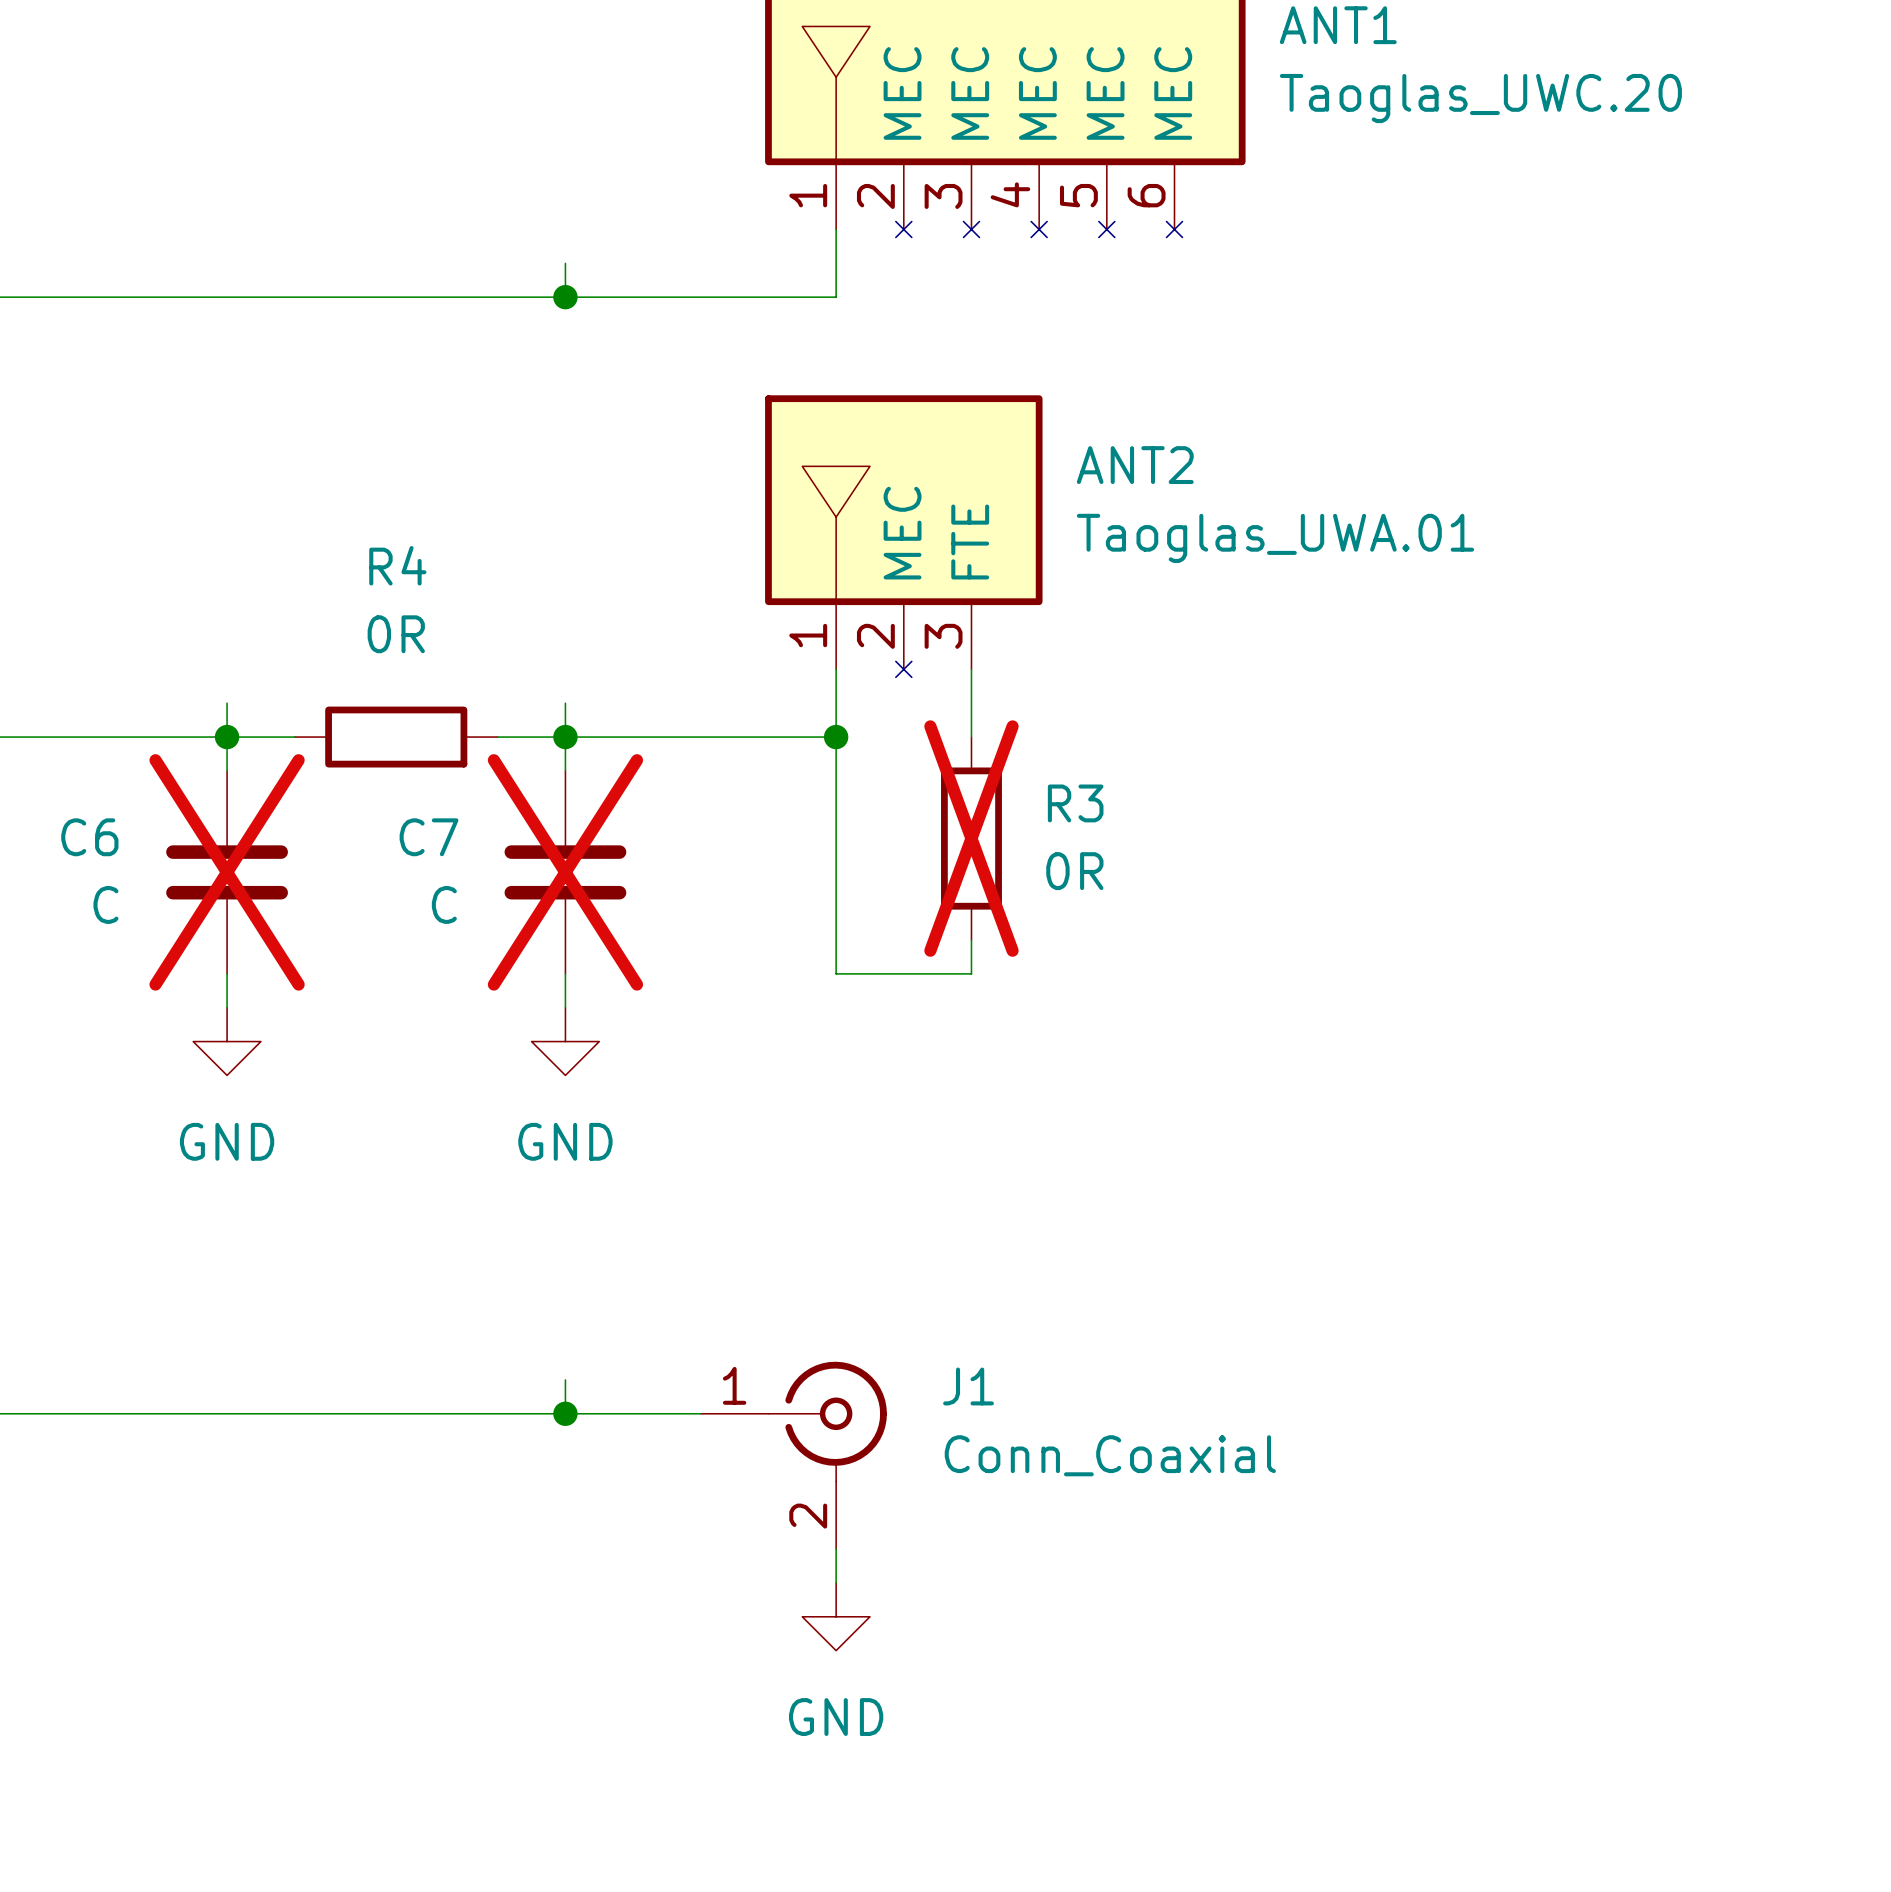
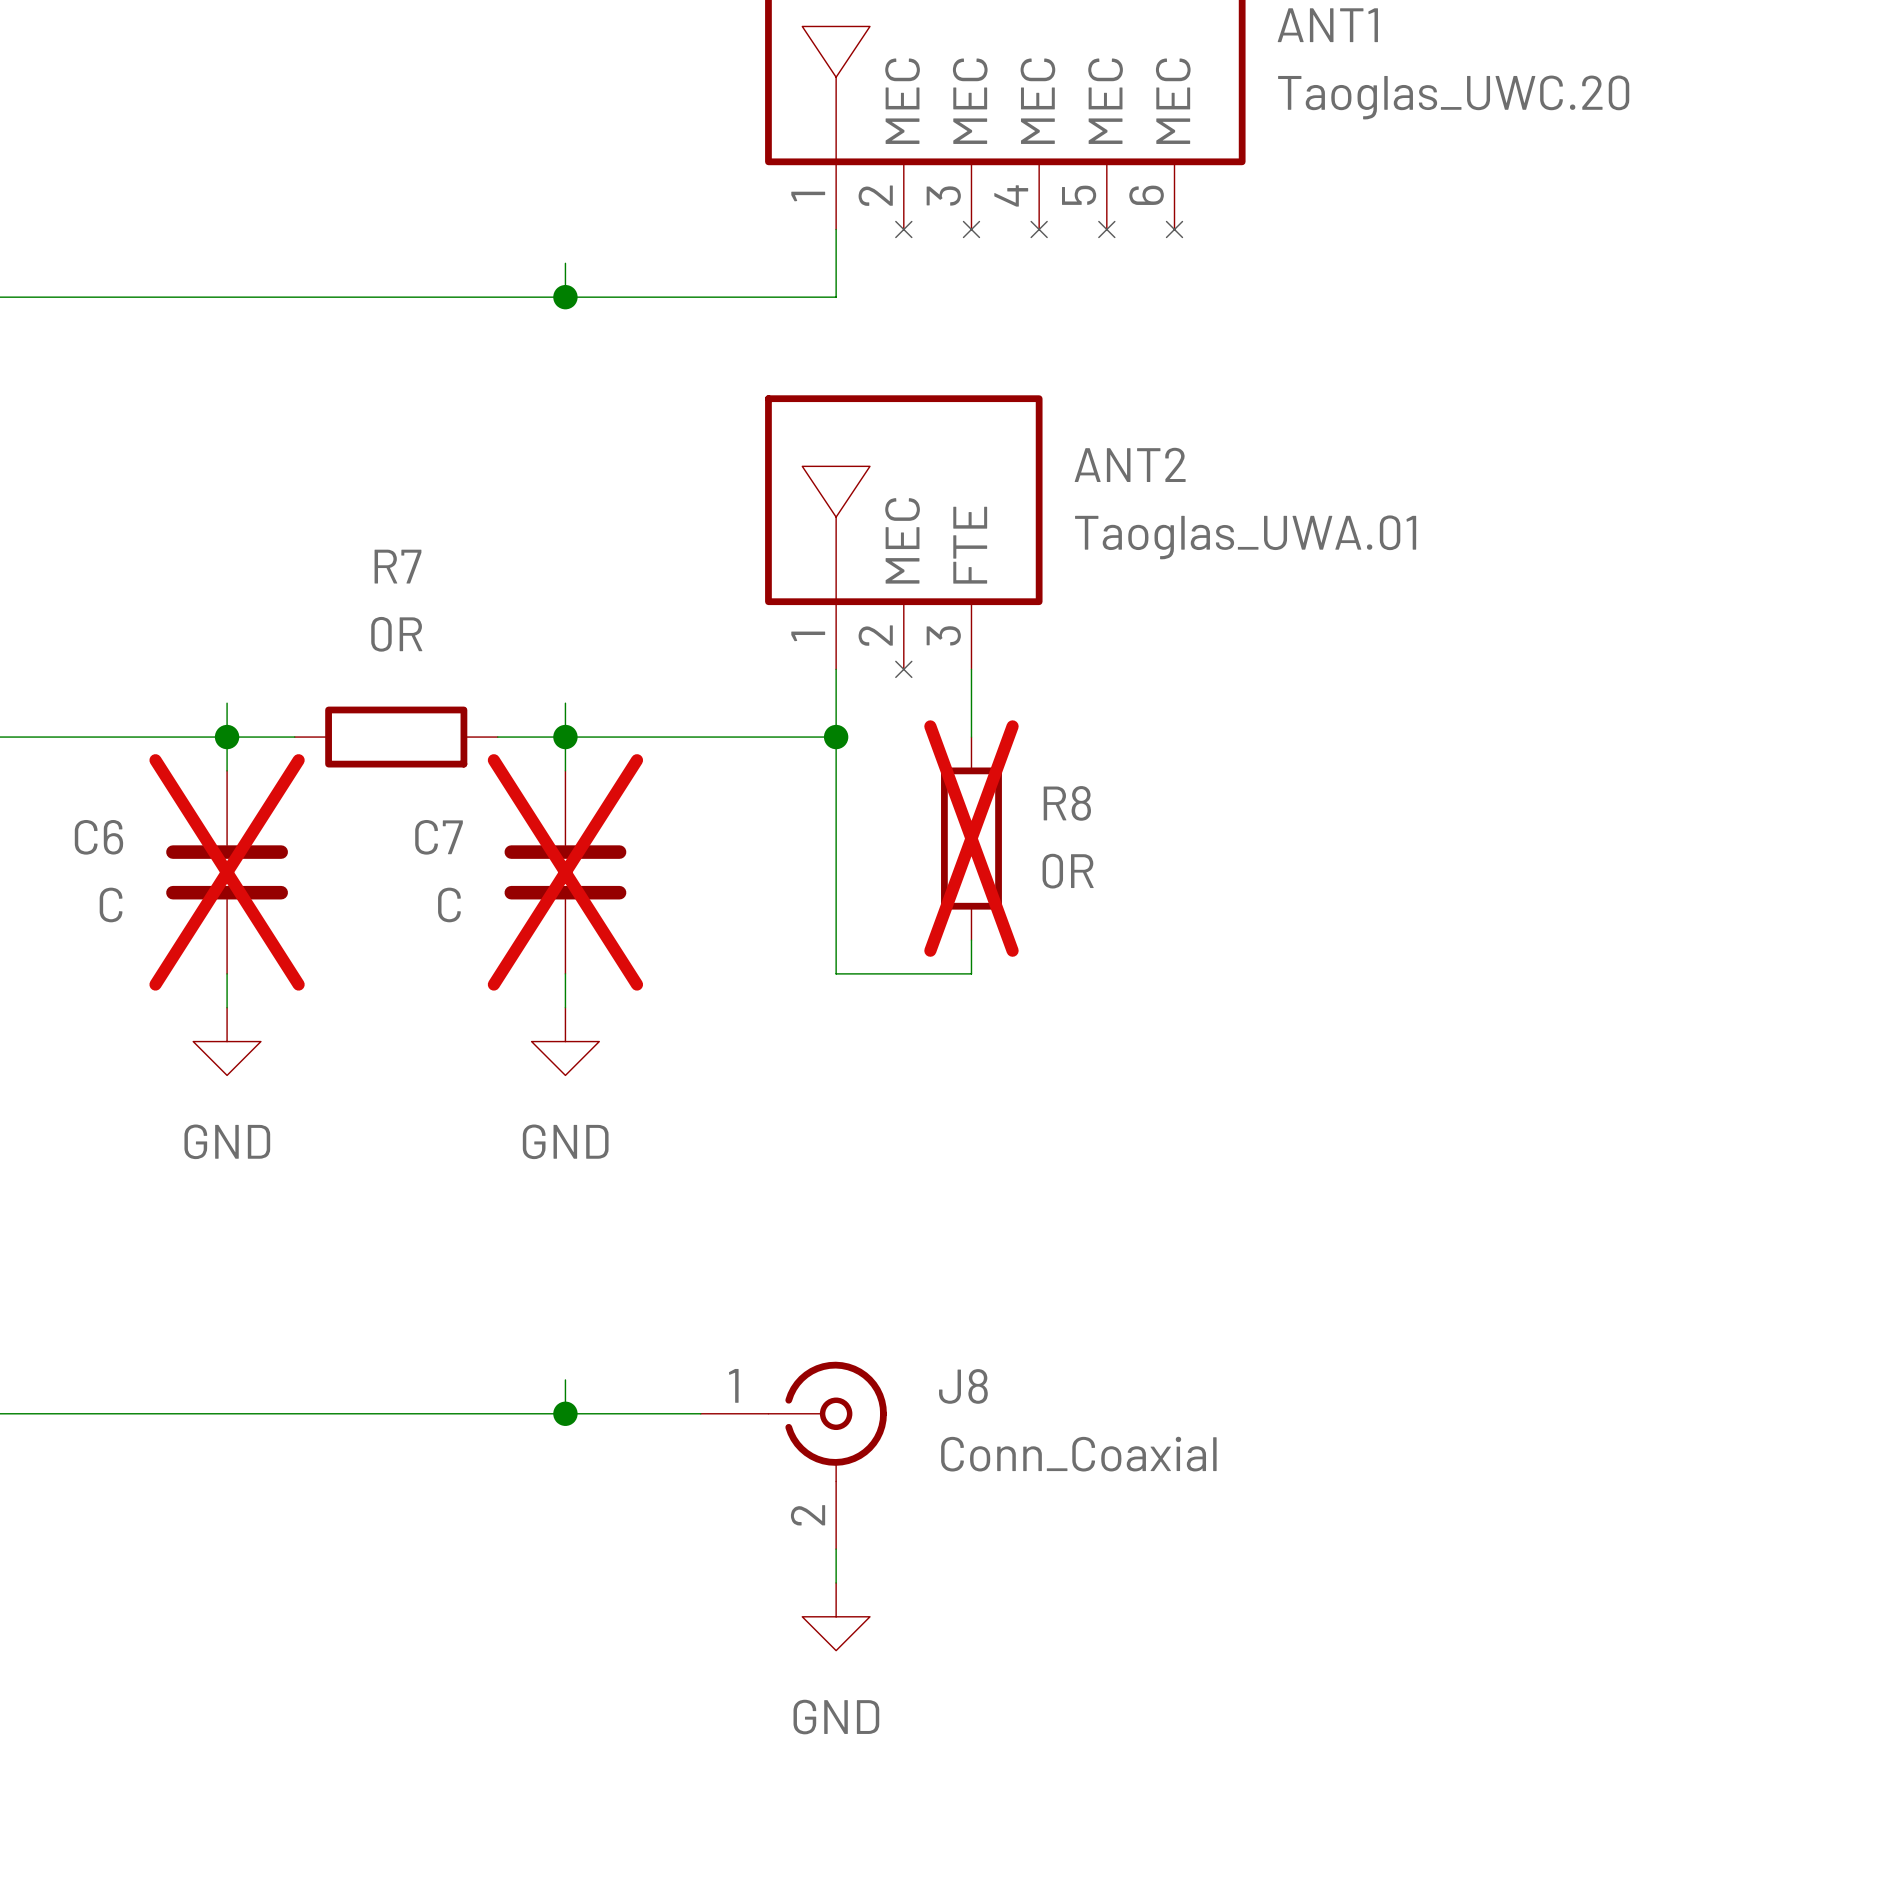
R4 name: R4 (397, 565) -> R7 (397, 566)
R3 name: R3 (1075, 803) -> R8 (1067, 803)
J1 name: J1 (968, 1386) -> J8 (963, 1386)

